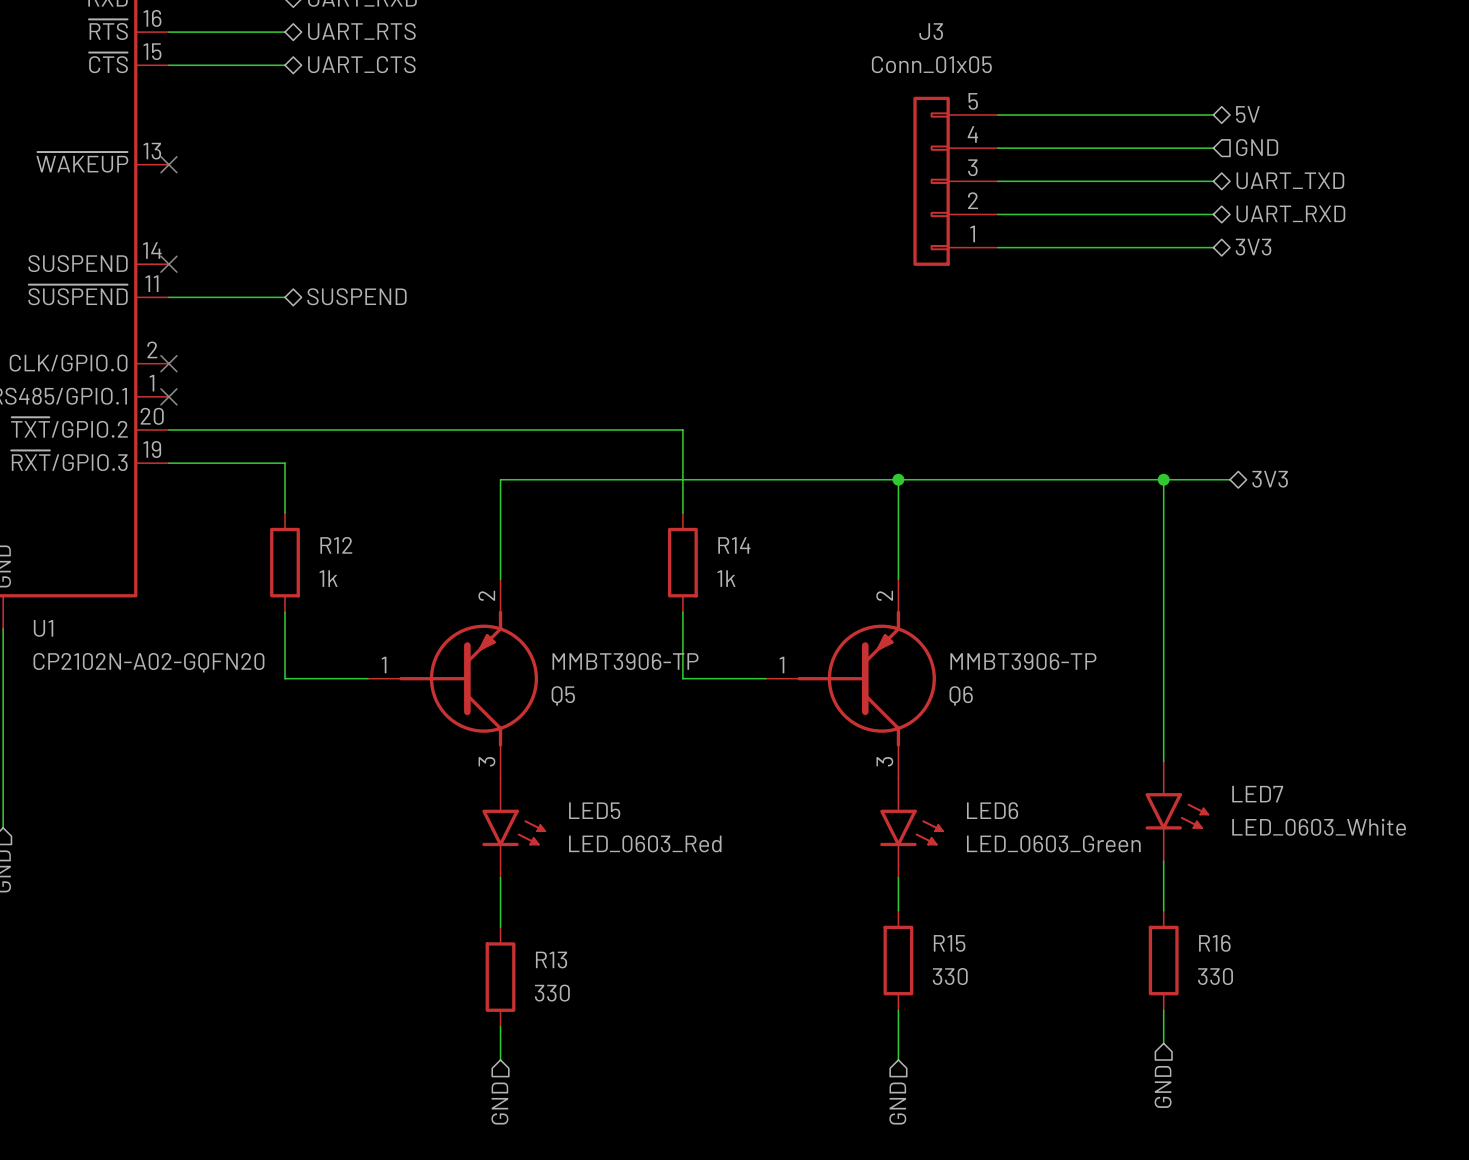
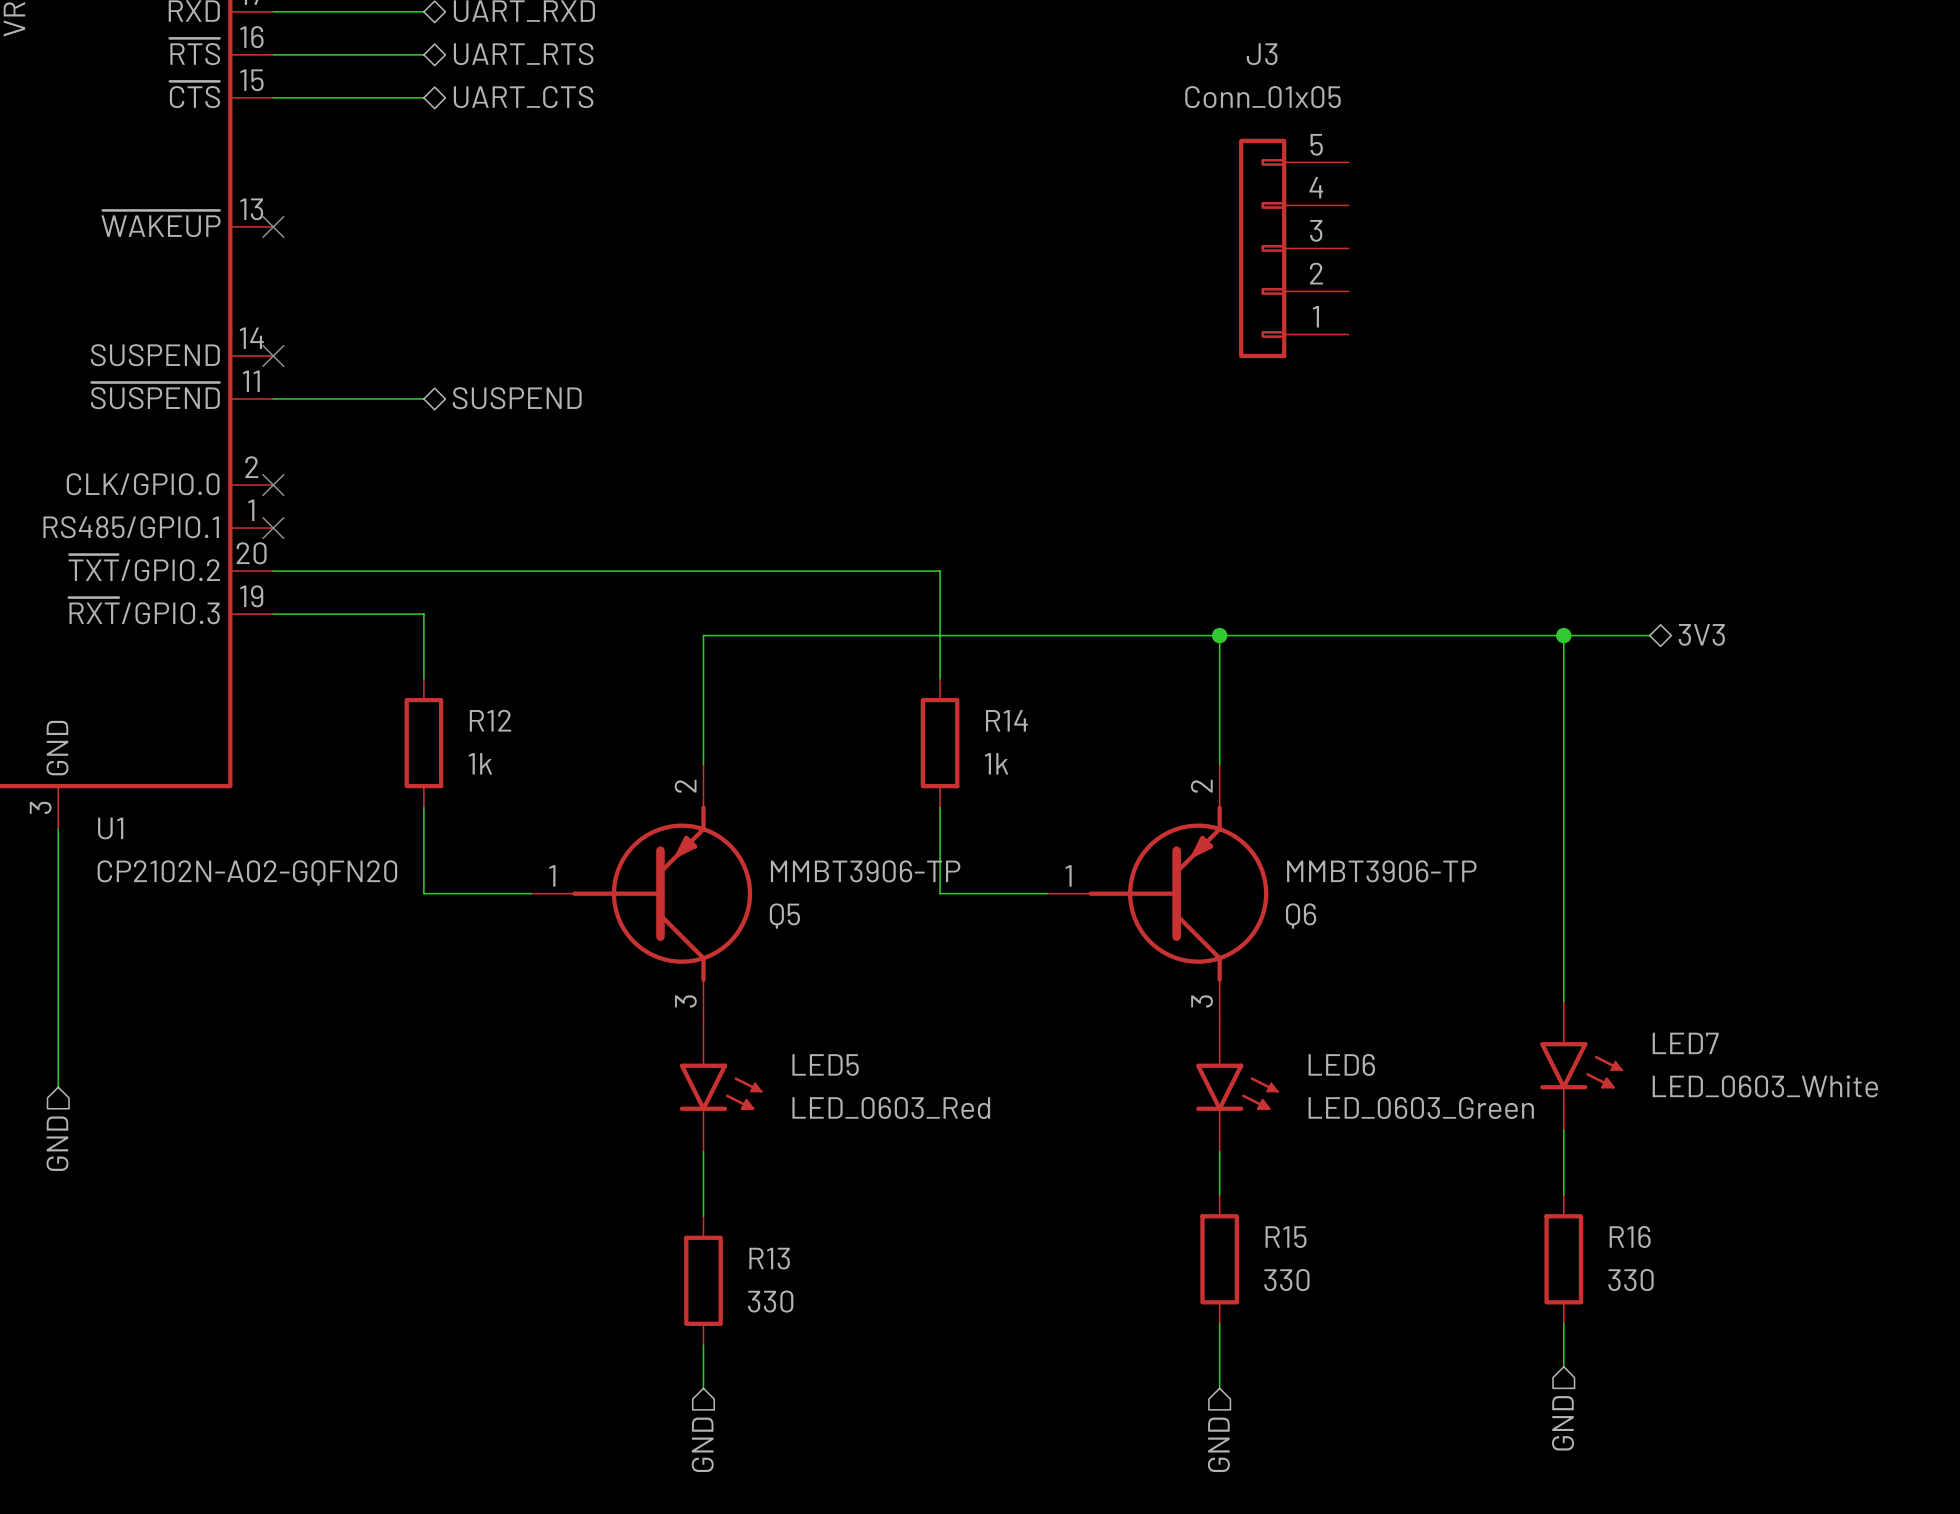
hierarchical label: 5V (1247, 114) -> none
wire: (997, 115) (1213, 115) -> none
hierarchical label: GND (1257, 147) -> none
wire: (997, 148) (1213, 148) -> none
hierarchical label: UART_TXD (1290, 180) -> none
wire: (997, 181) (1213, 181) -> none
hierarchical label: UART_RXD (1290, 213) -> none
wire: (997, 214) (1213, 214) -> none
wire: (997, 247) (1213, 247) -> none
hierarchical label: 3V3 (1253, 247) -> none

